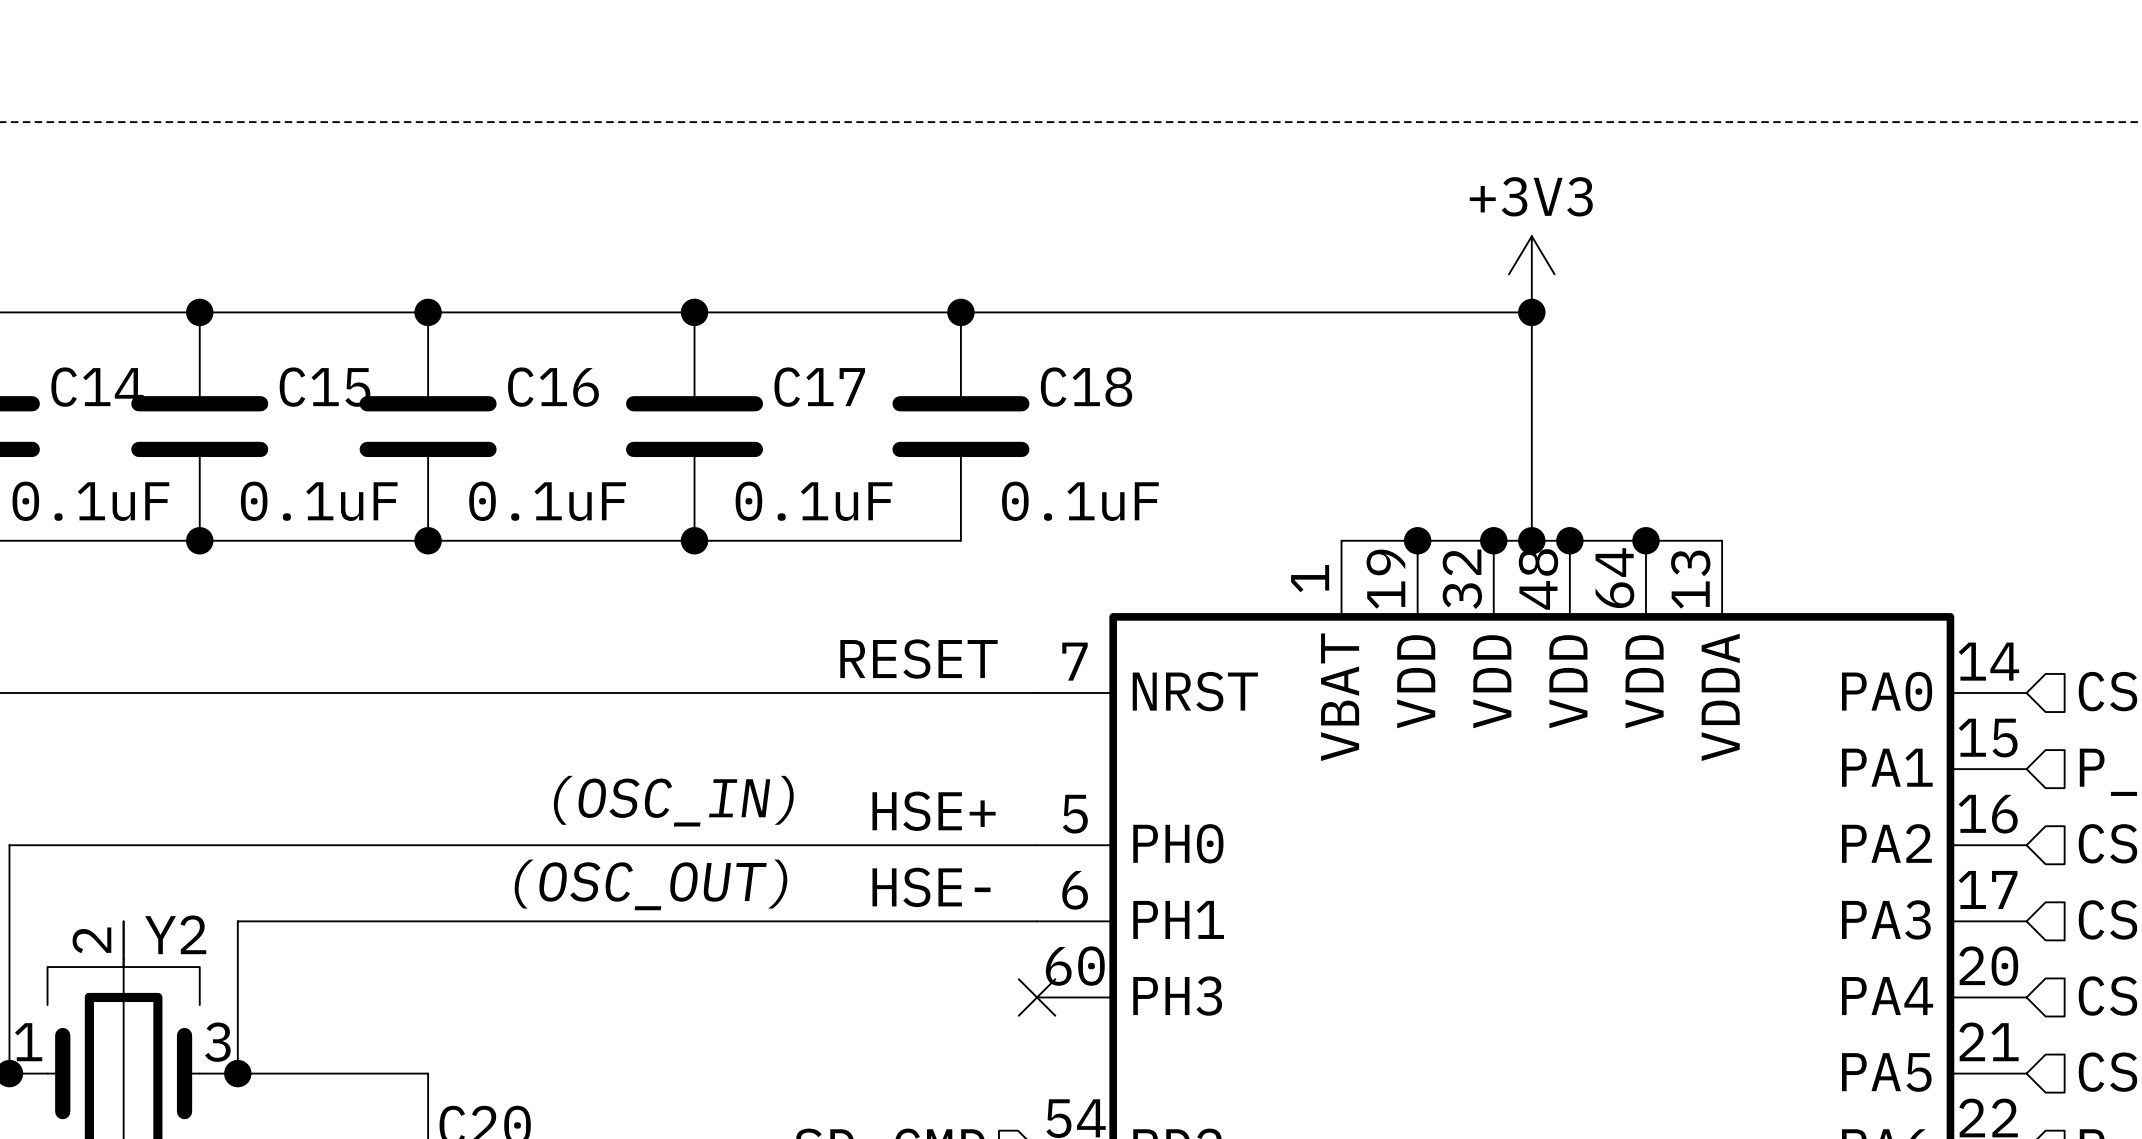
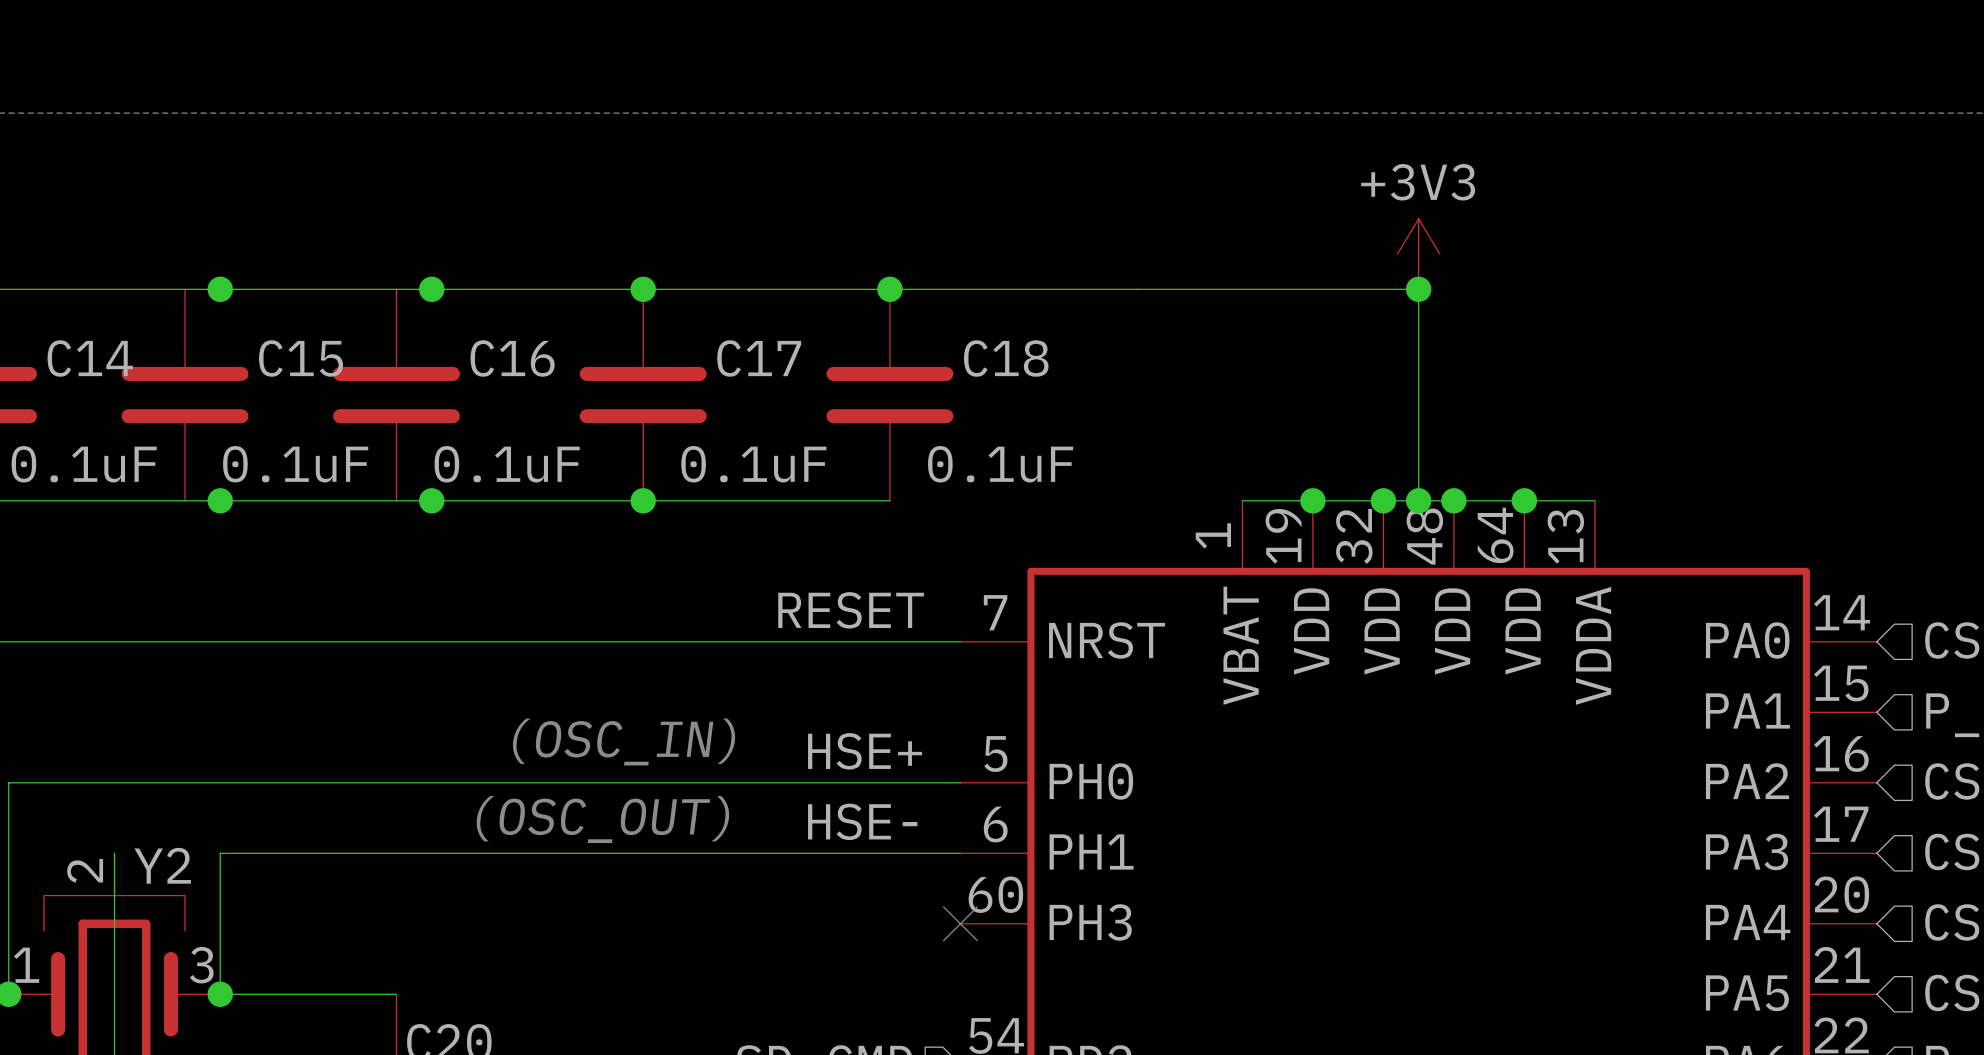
junction position: (199, 312) -> (220, 289)
junction position: (428, 312) -> (431, 289)
junction position: (199, 540) -> (220, 500)
junction position: (428, 540) -> (431, 500)

